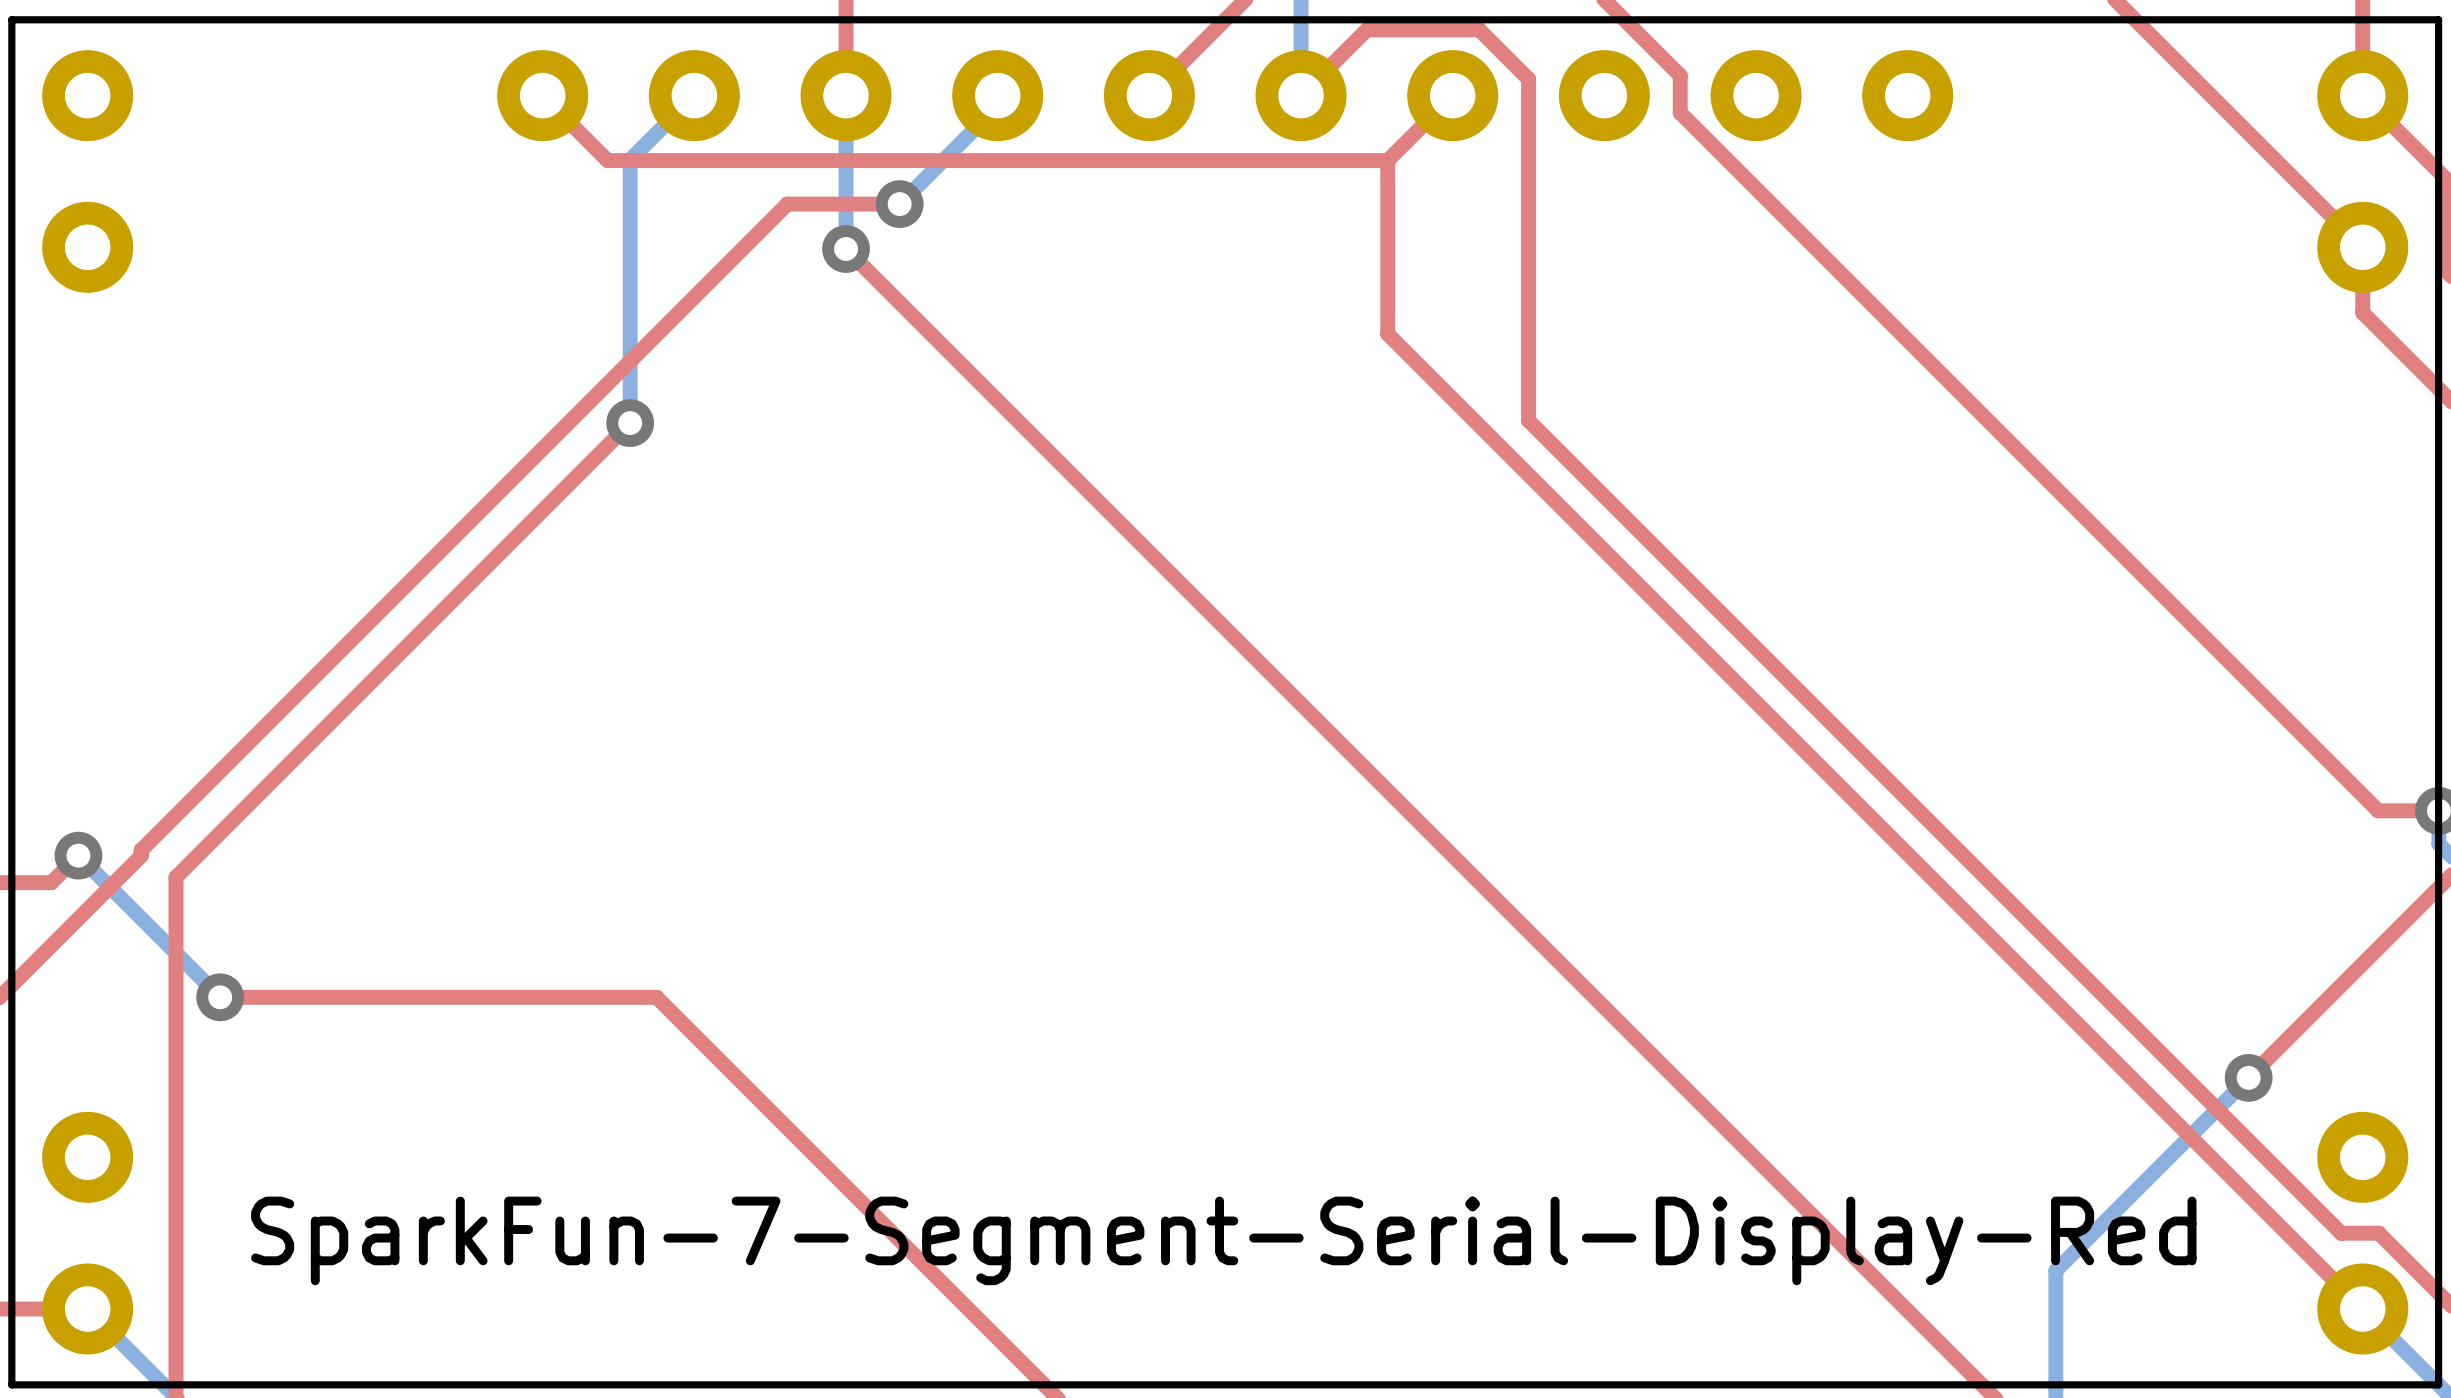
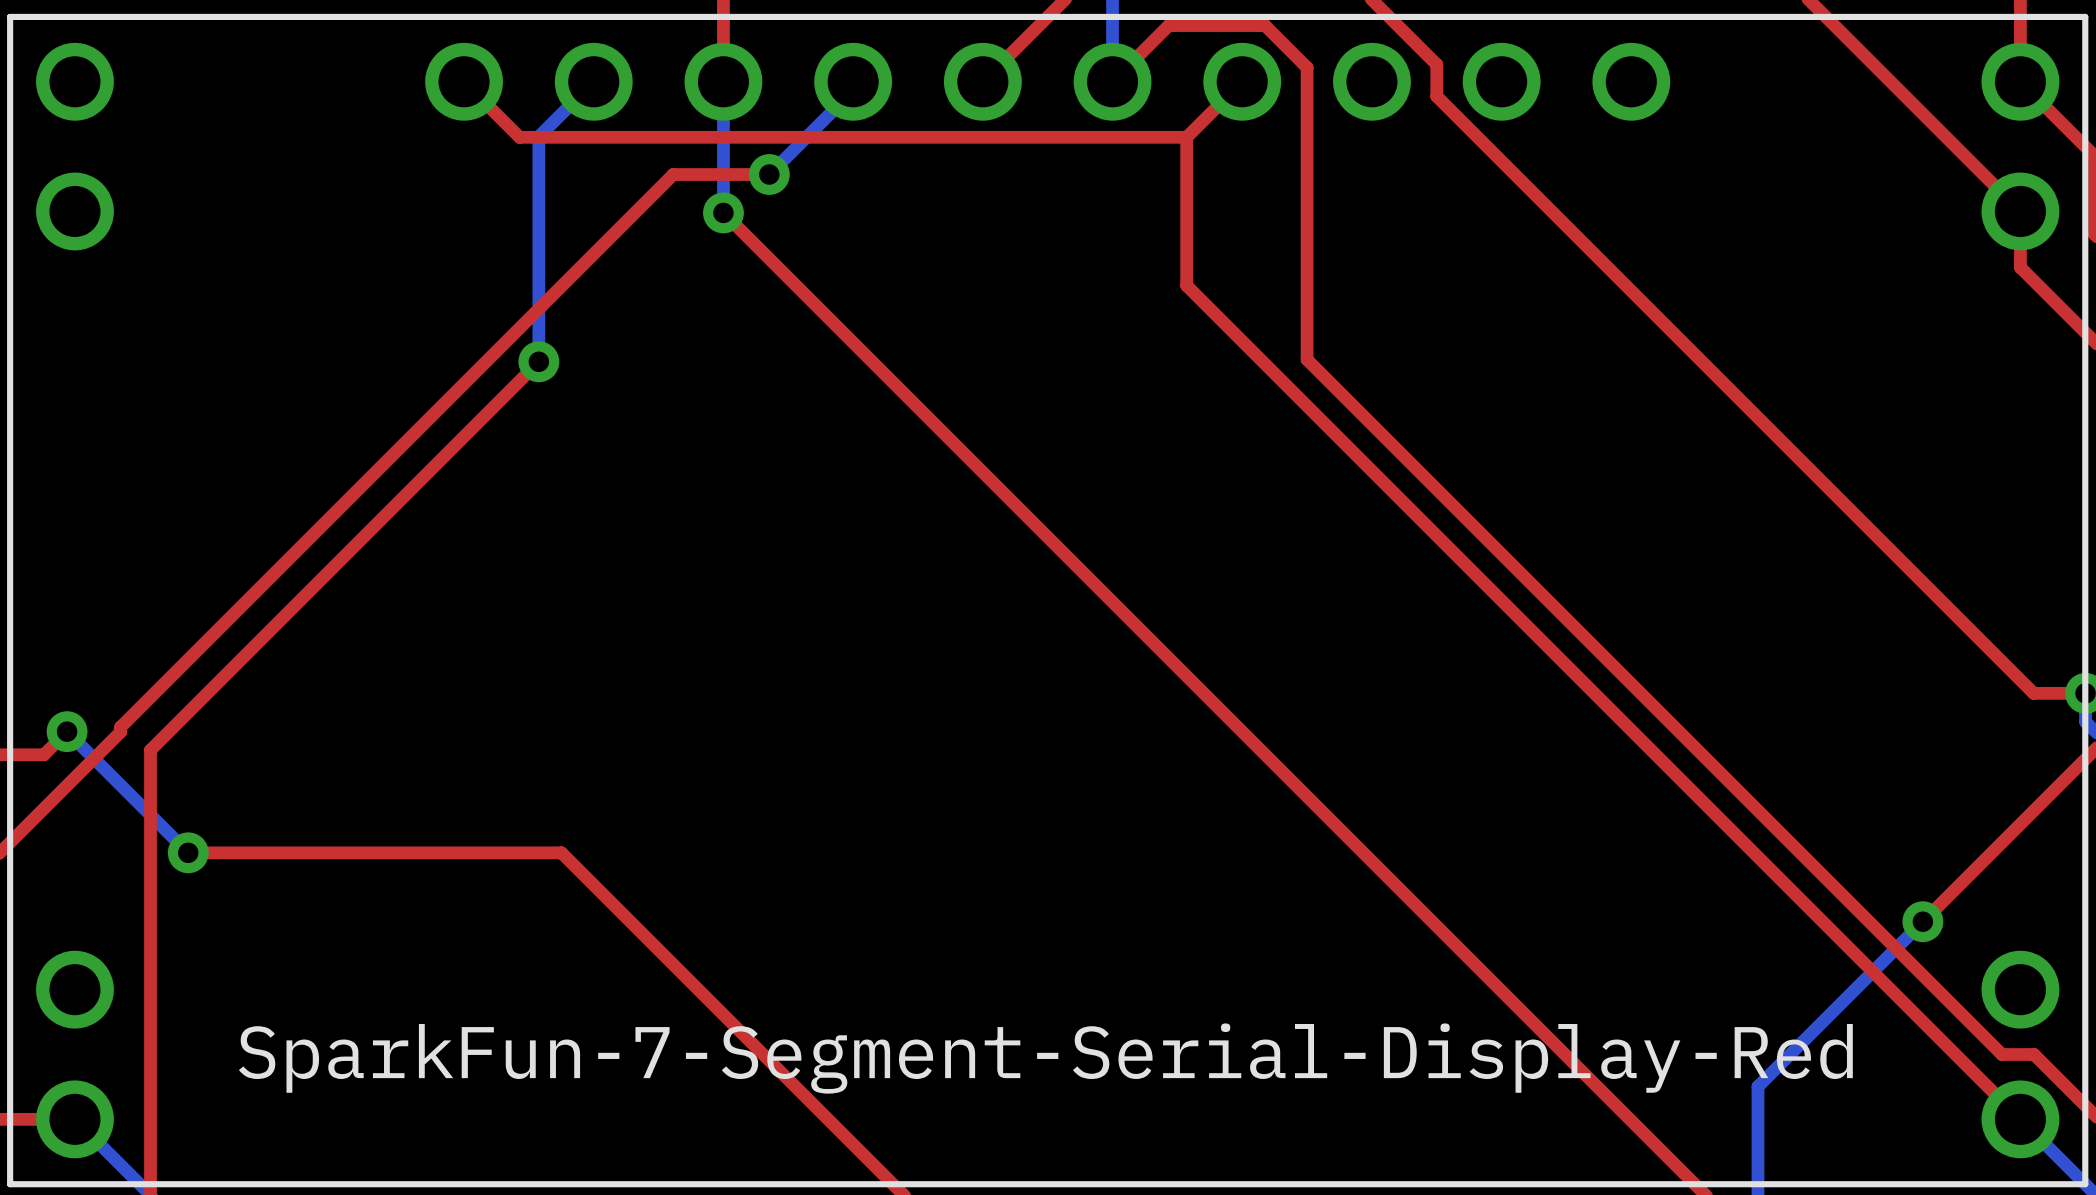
part footprint: [8, 16, 2443, 1389] -> [7, 13, 2089, 1188]

